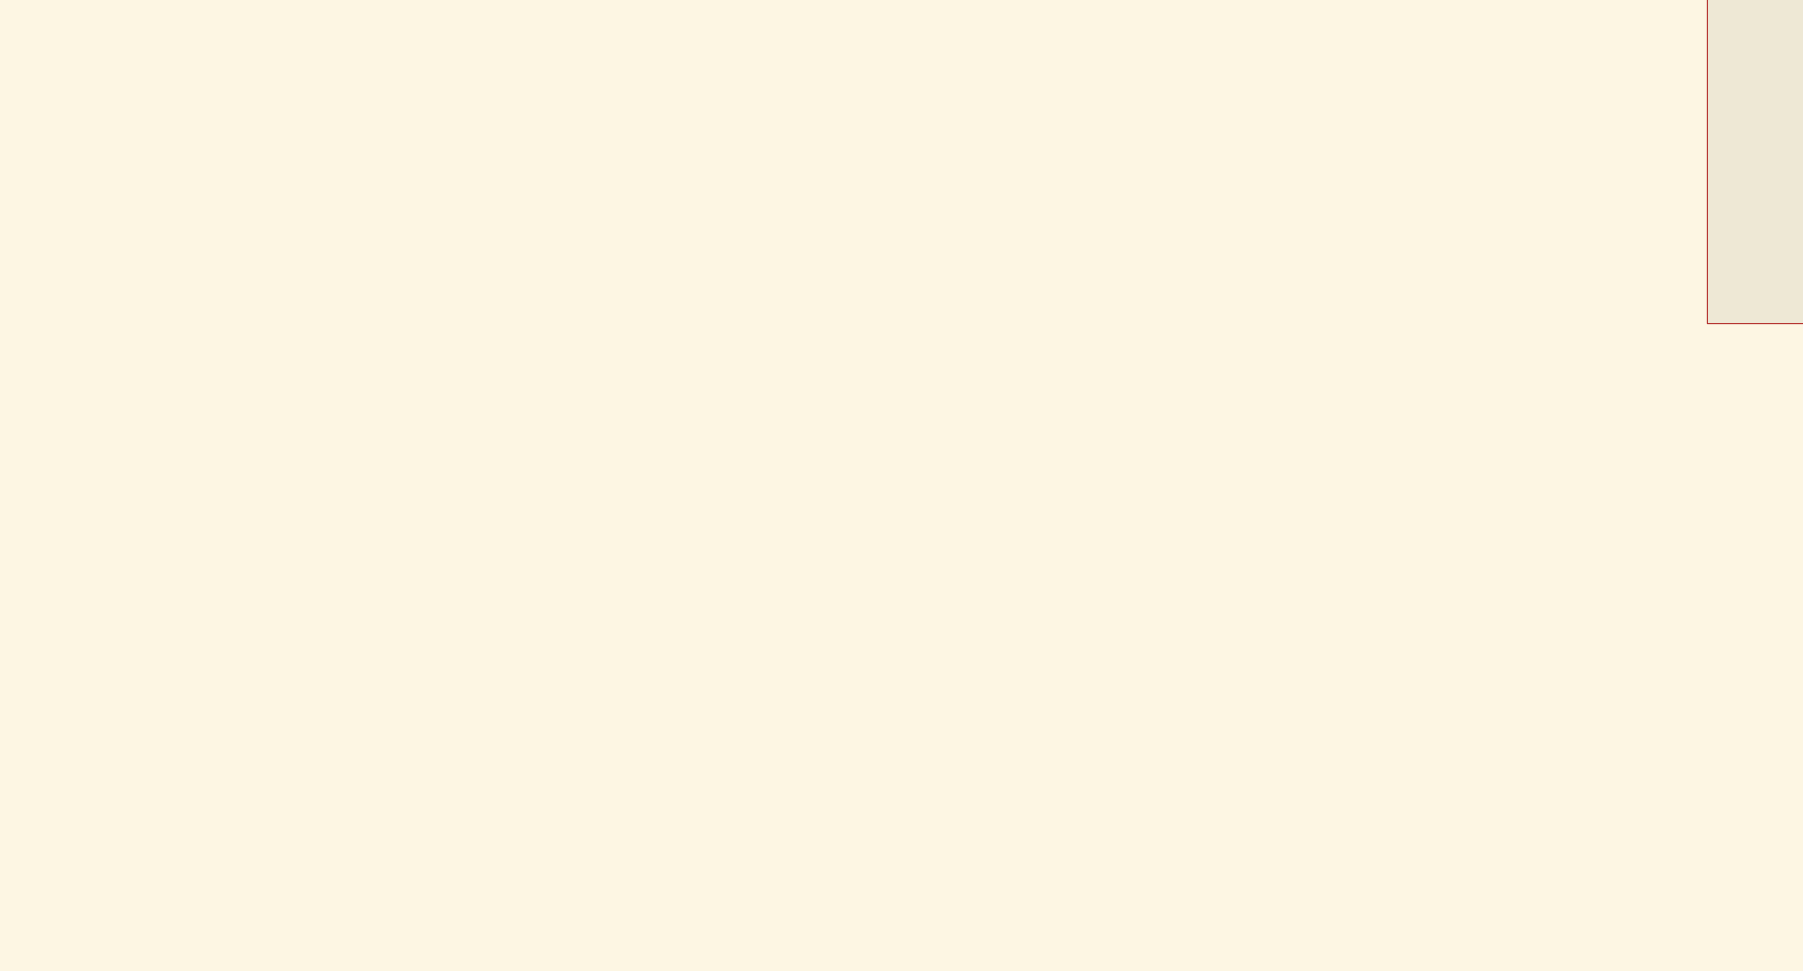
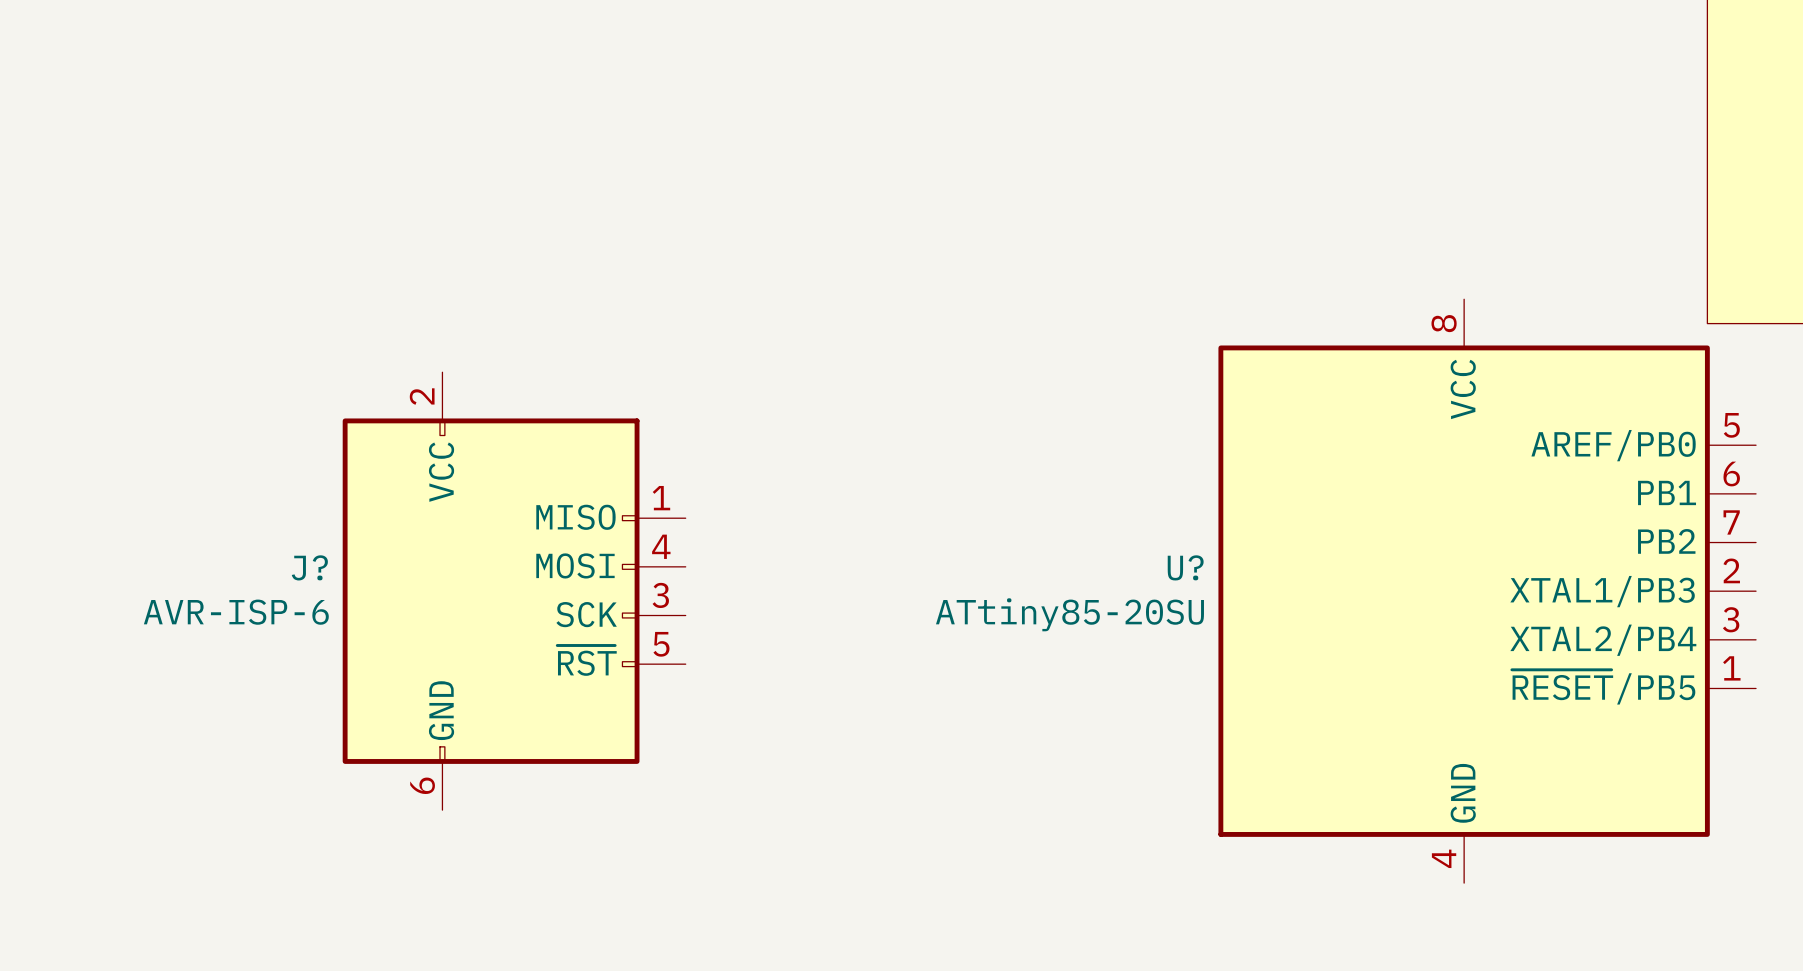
J?: none -> AVR-ISP-6 (514, 591)
U?: none -> ATtiny85-20SU (1487, 591)

